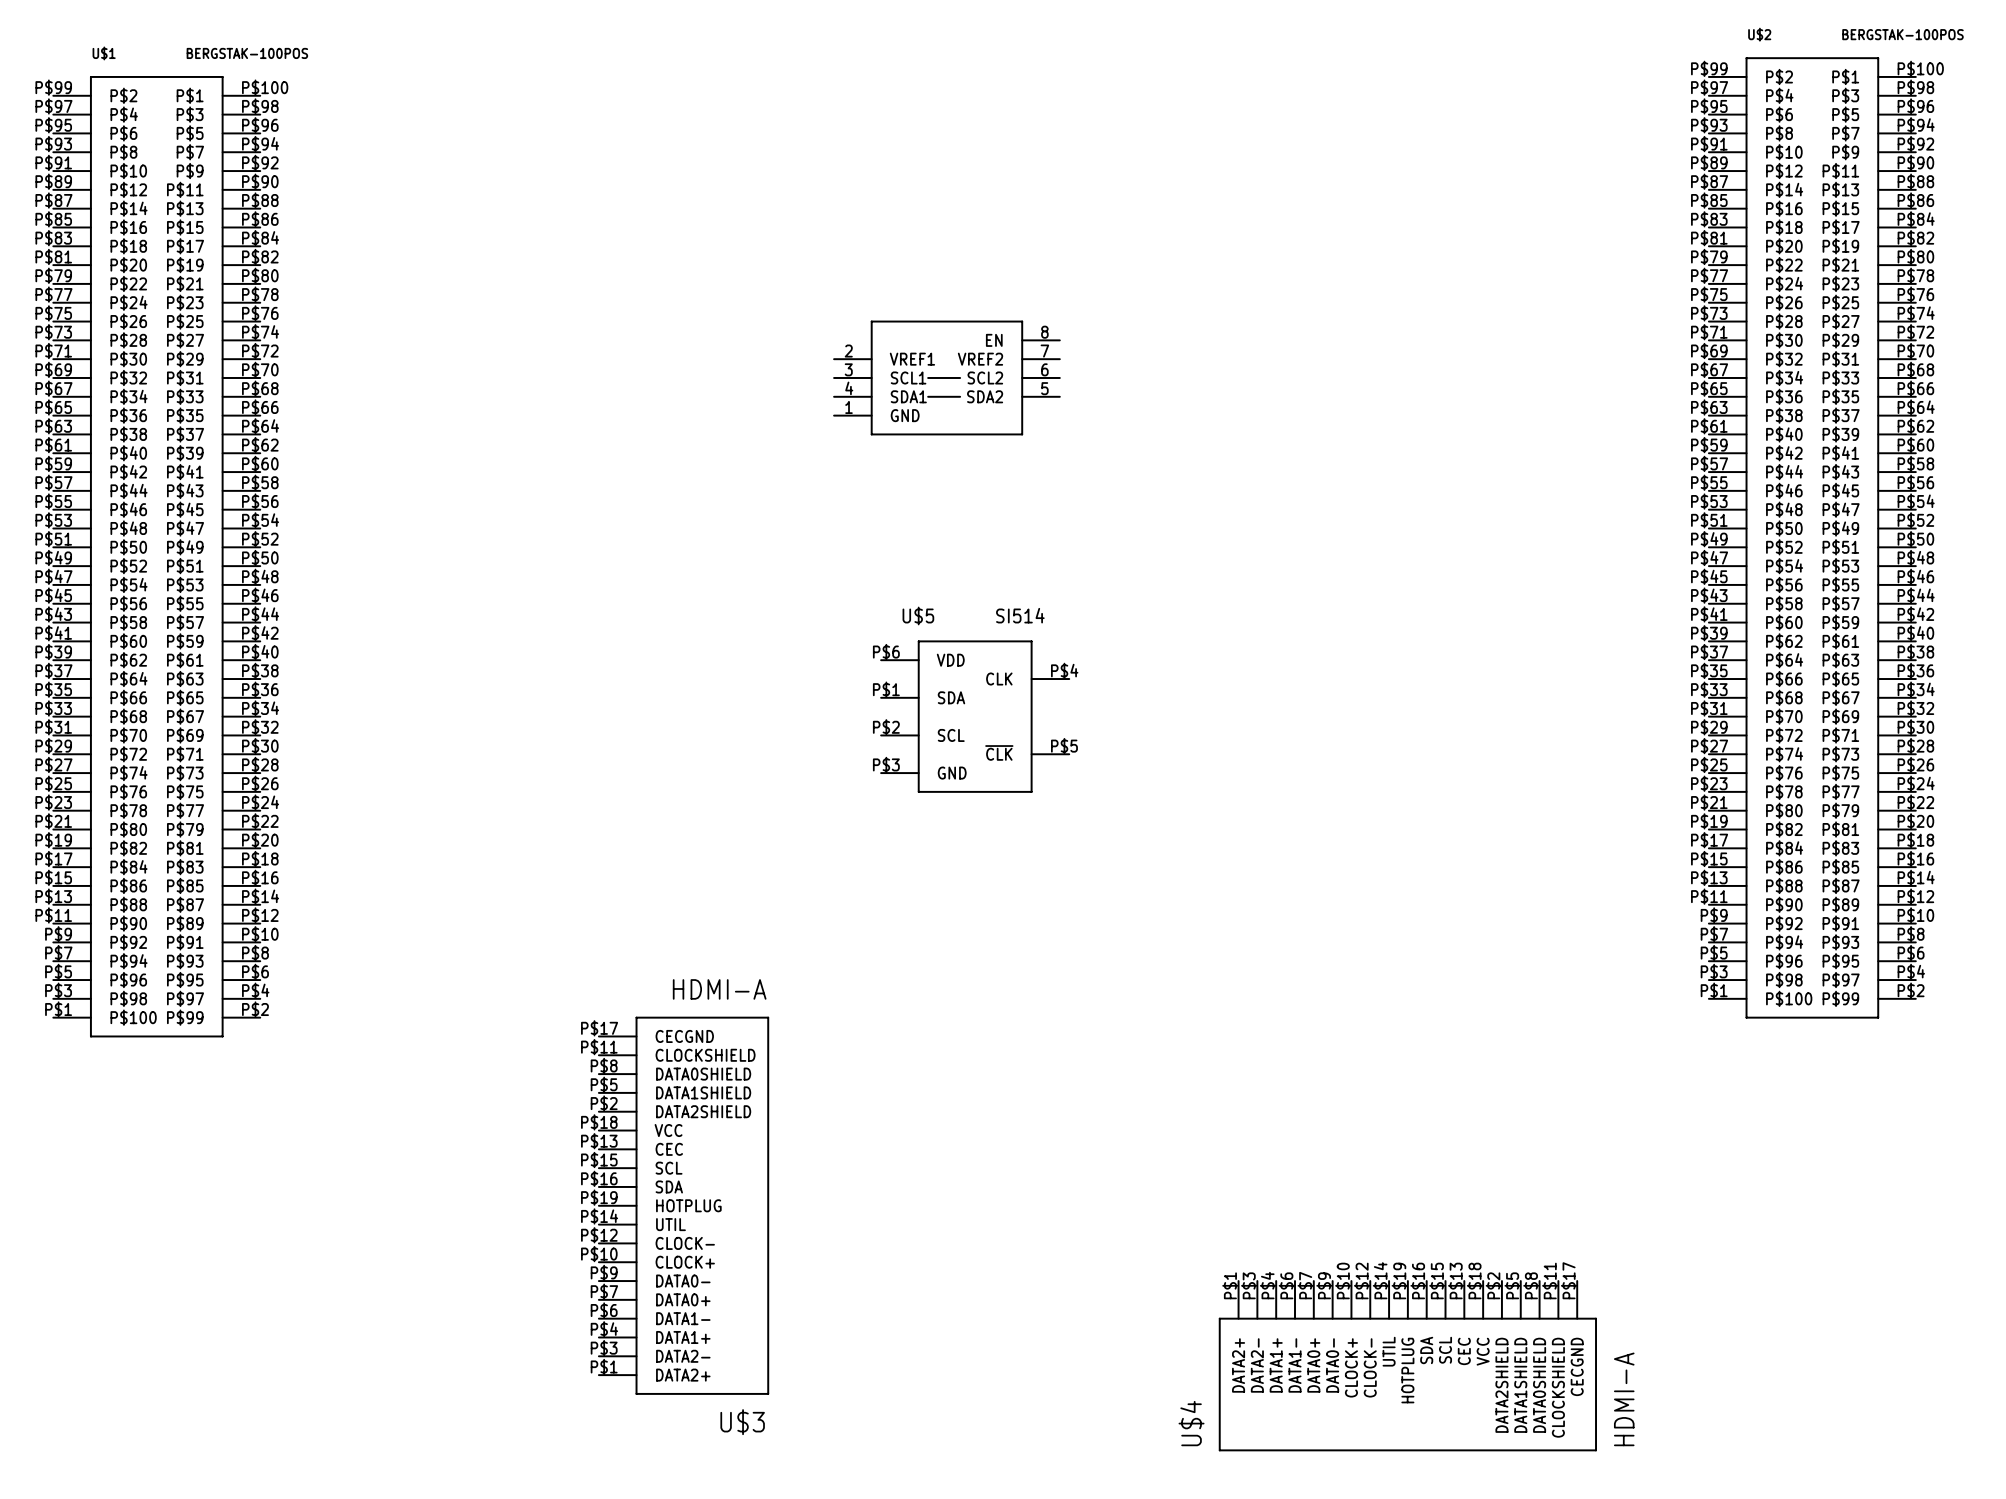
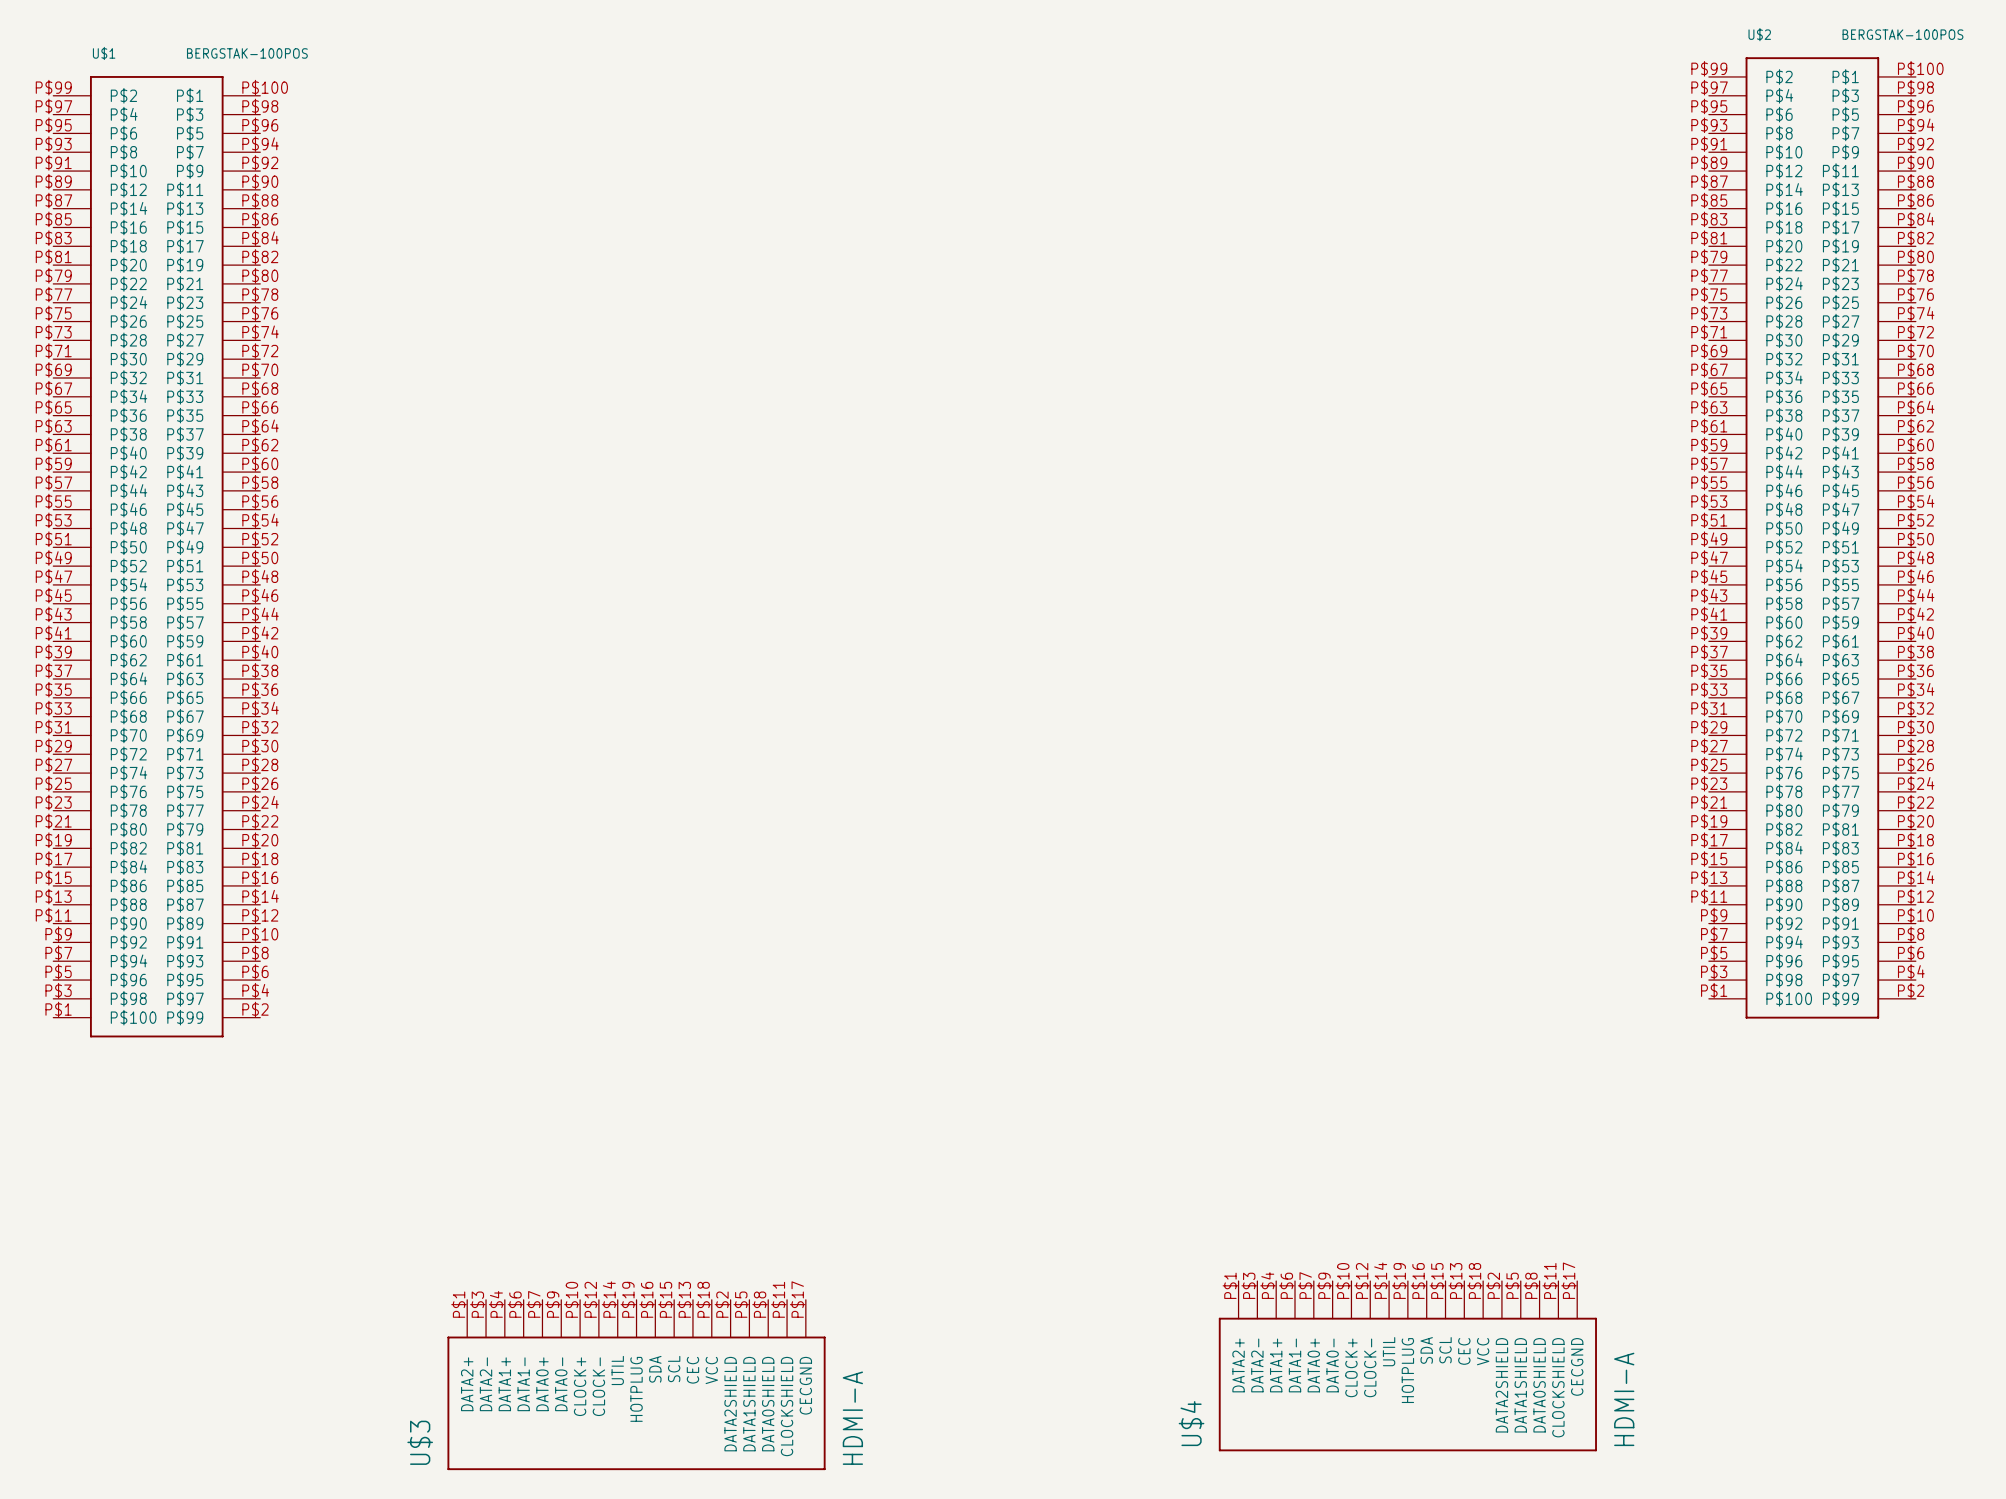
part: (946, 377) -> none
U$5: SI514 (975, 716) -> none
U$3 rotation: 0° (702, 1205) -> 90° clockwise (636, 1403)

